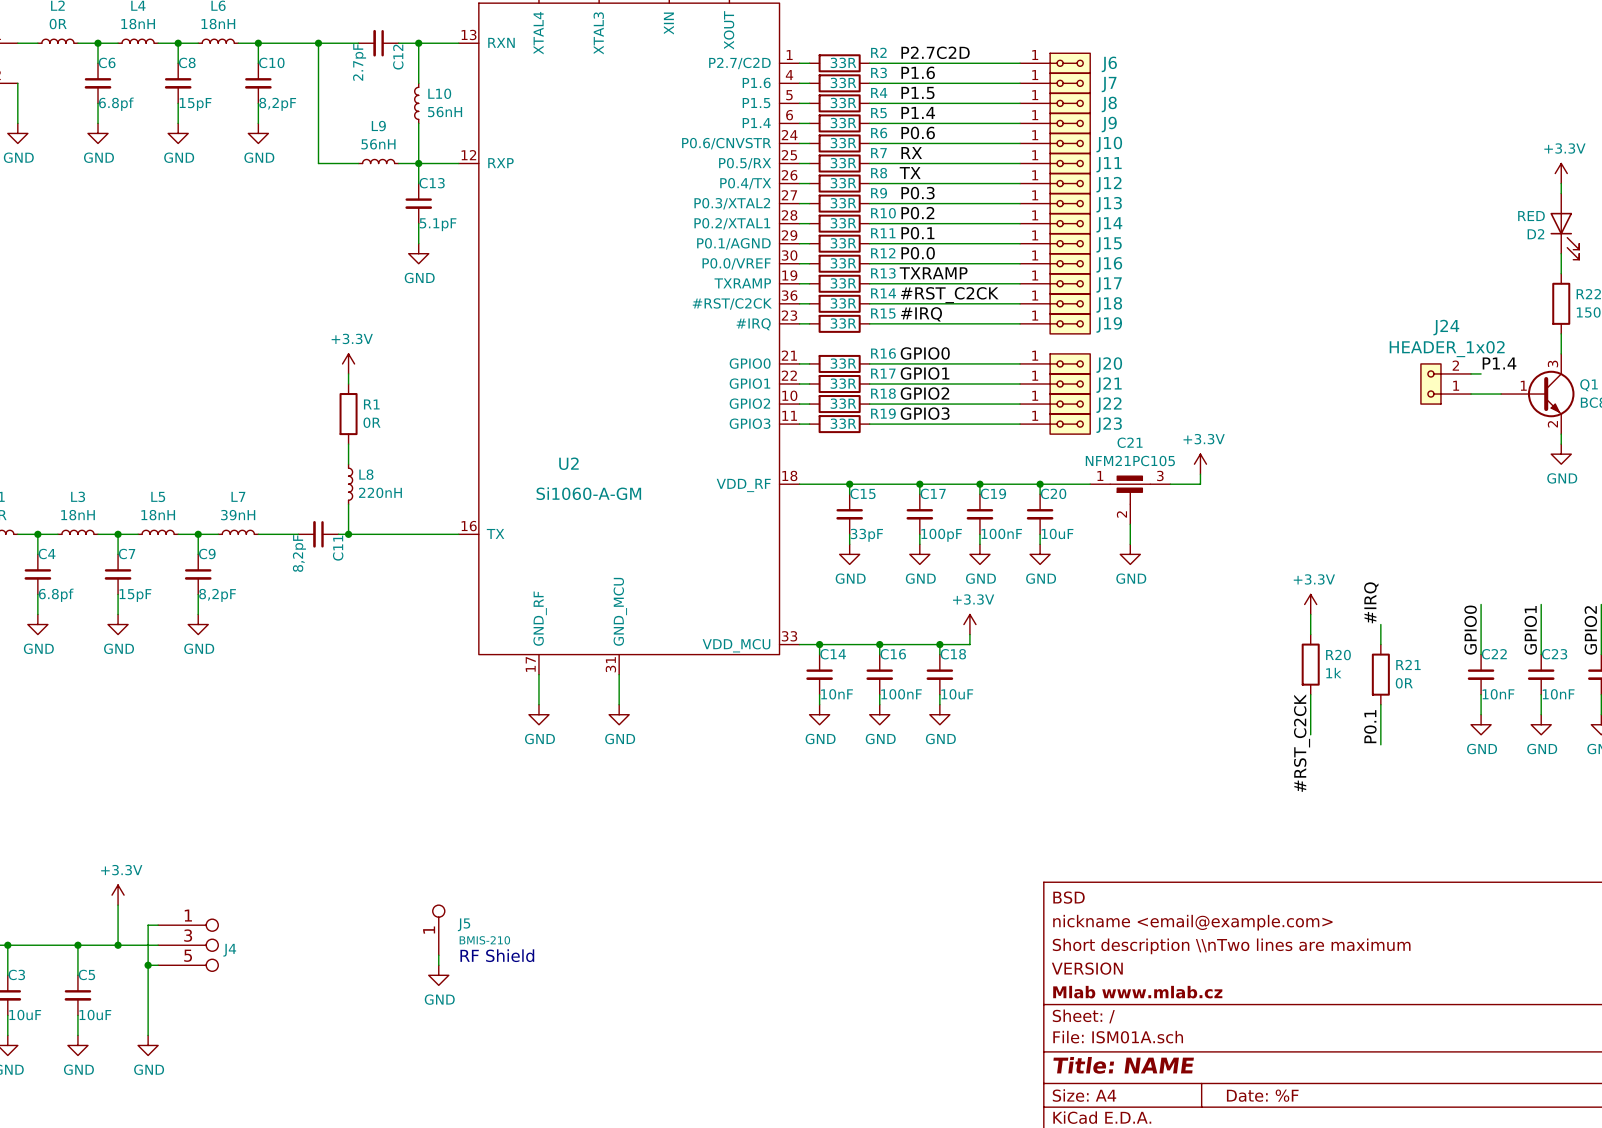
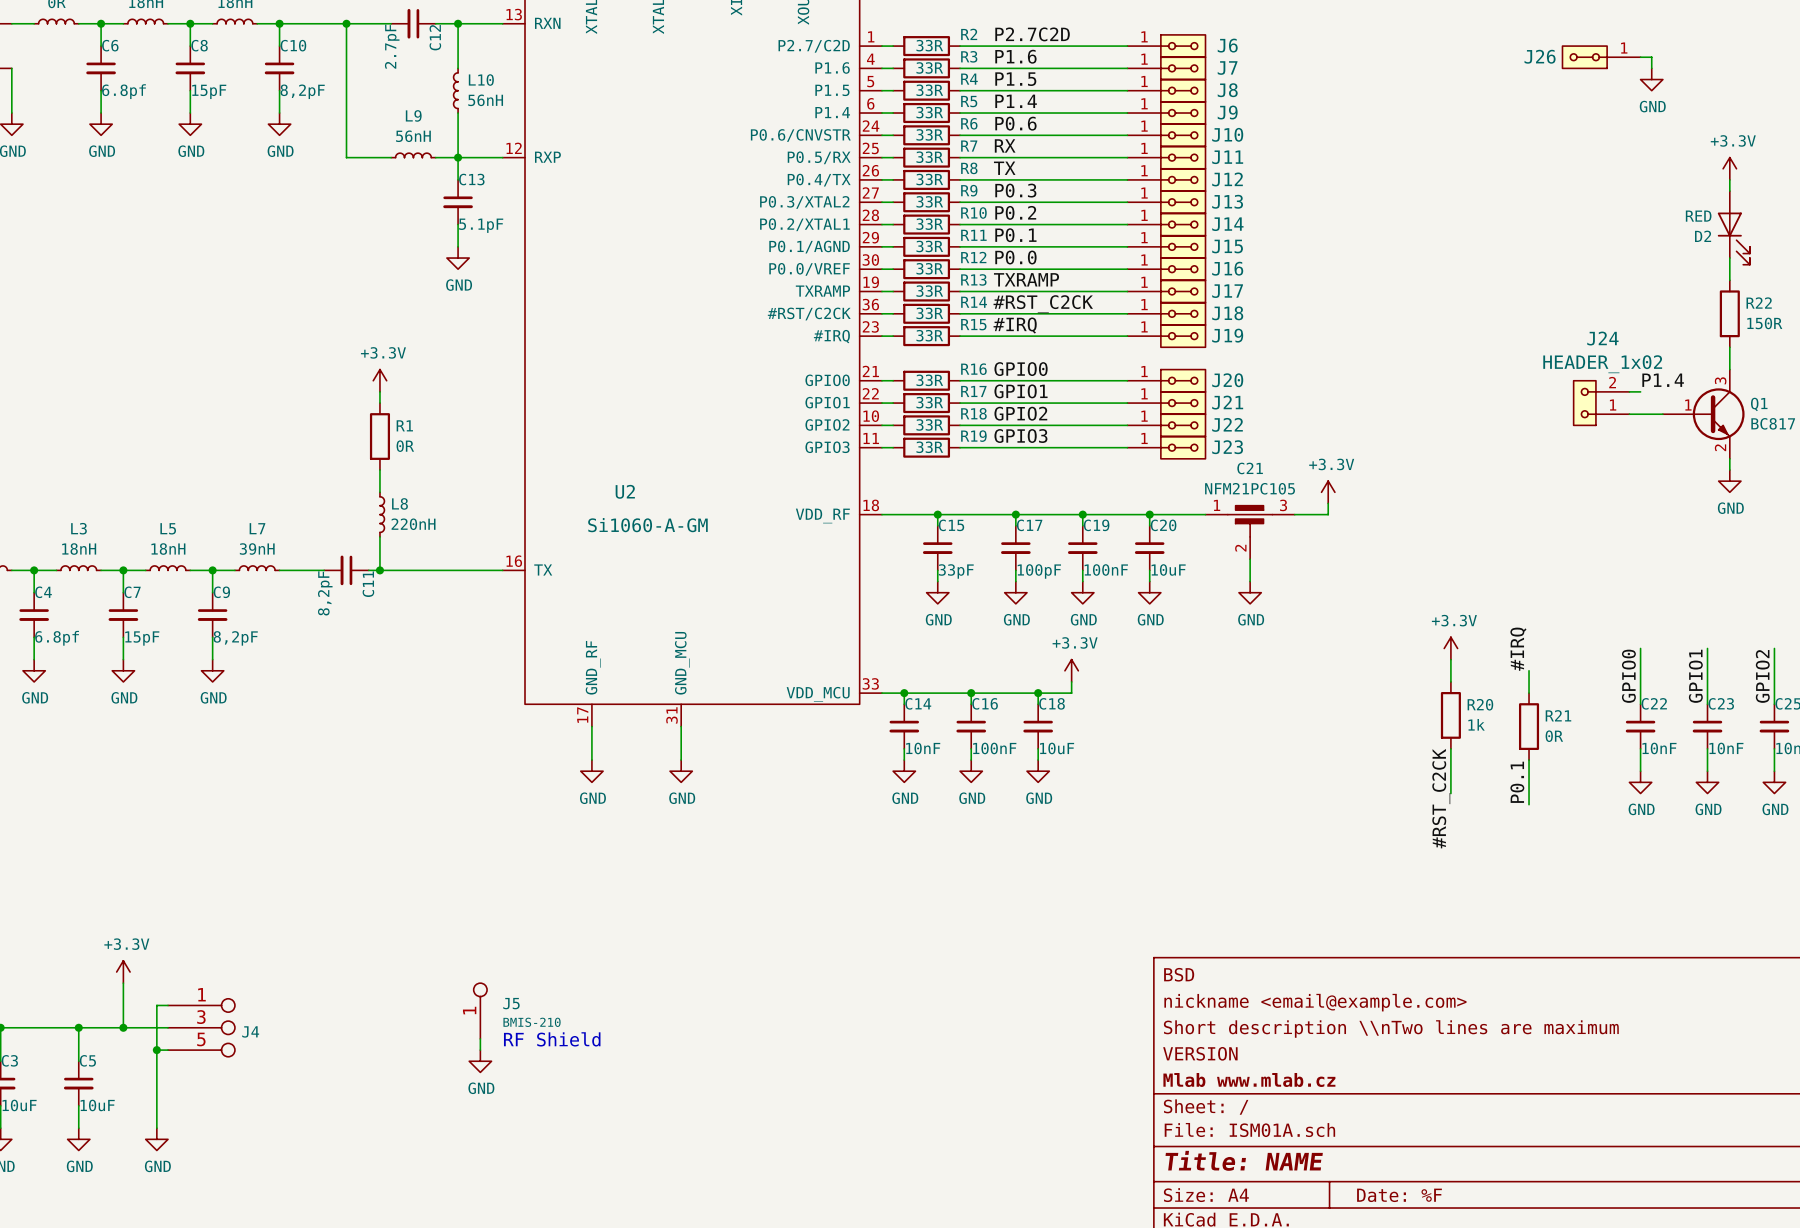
J26: none -> (1601, 57)
wire: none -> (1640, 57) (1651, 57) (1651, 68)
power symbol: none -> GND (1651, 79)

